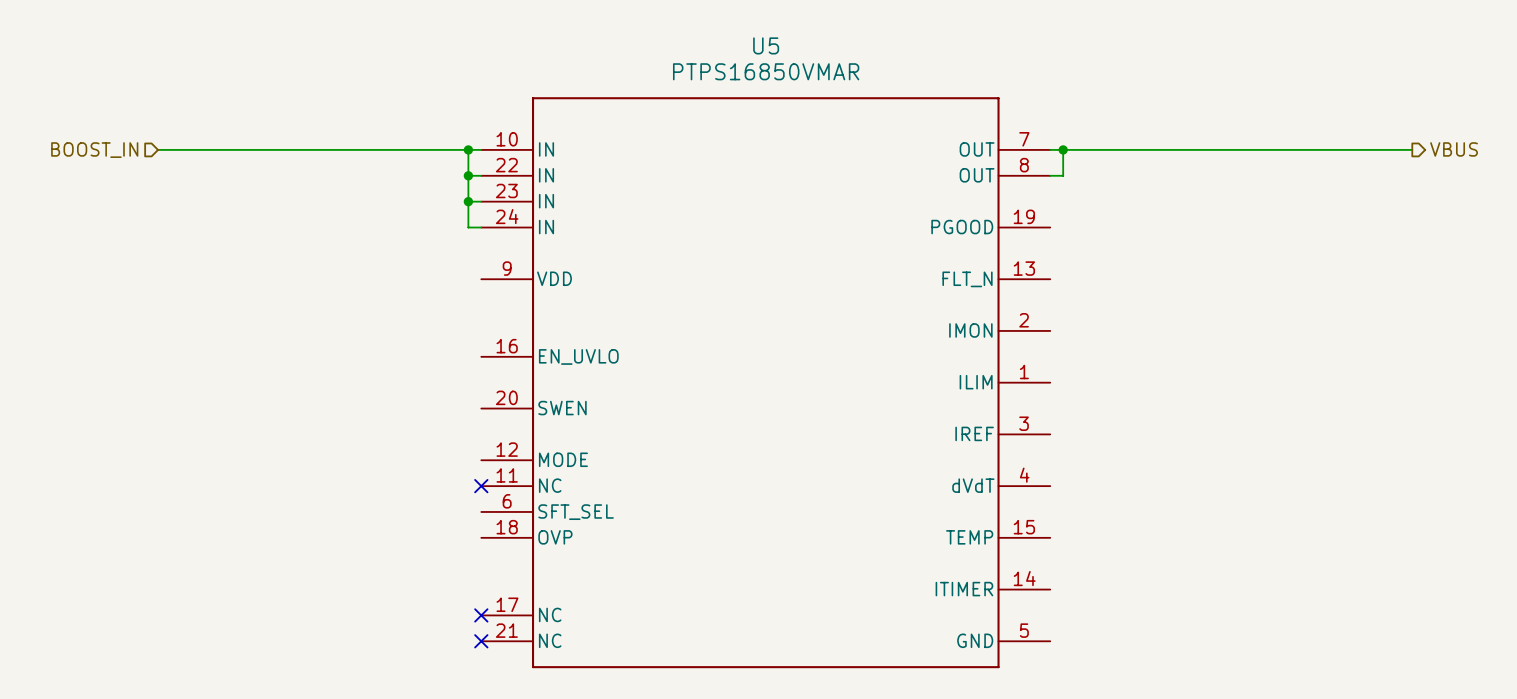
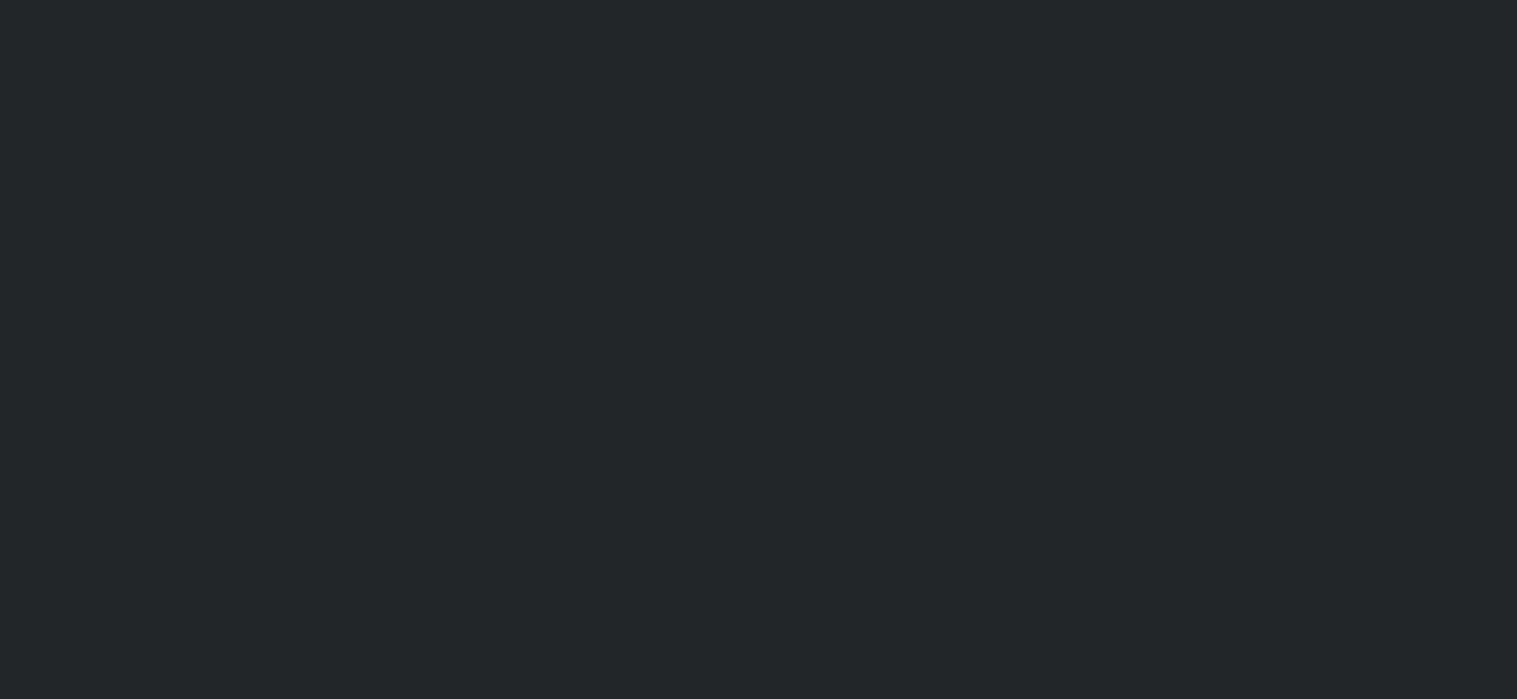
wire: (158, 149) (481, 149) -> none
wire: (468, 149) (468, 227) (481, 227) -> none
junction: (468, 149) -> none
wire: (1050, 149) (1412, 149) -> none
wire: (1063, 149) (1063, 175) (1050, 175) -> none
junction: (1063, 149) -> none
hierarchical label: VBUS (1454, 149) -> none
hierarchical label: BOOST_IN (94, 150) -> none
wire: (468, 175) (481, 175) -> none
junction: (468, 175) -> none
wire: (468, 201) (481, 201) -> none
junction: (468, 201) -> none
U5: PTPS16850VMAR (765, 382) -> none
no-connect mark: (481, 486) -> none
no-connect mark: (481, 615) -> none
no-connect mark: (481, 641) -> none

